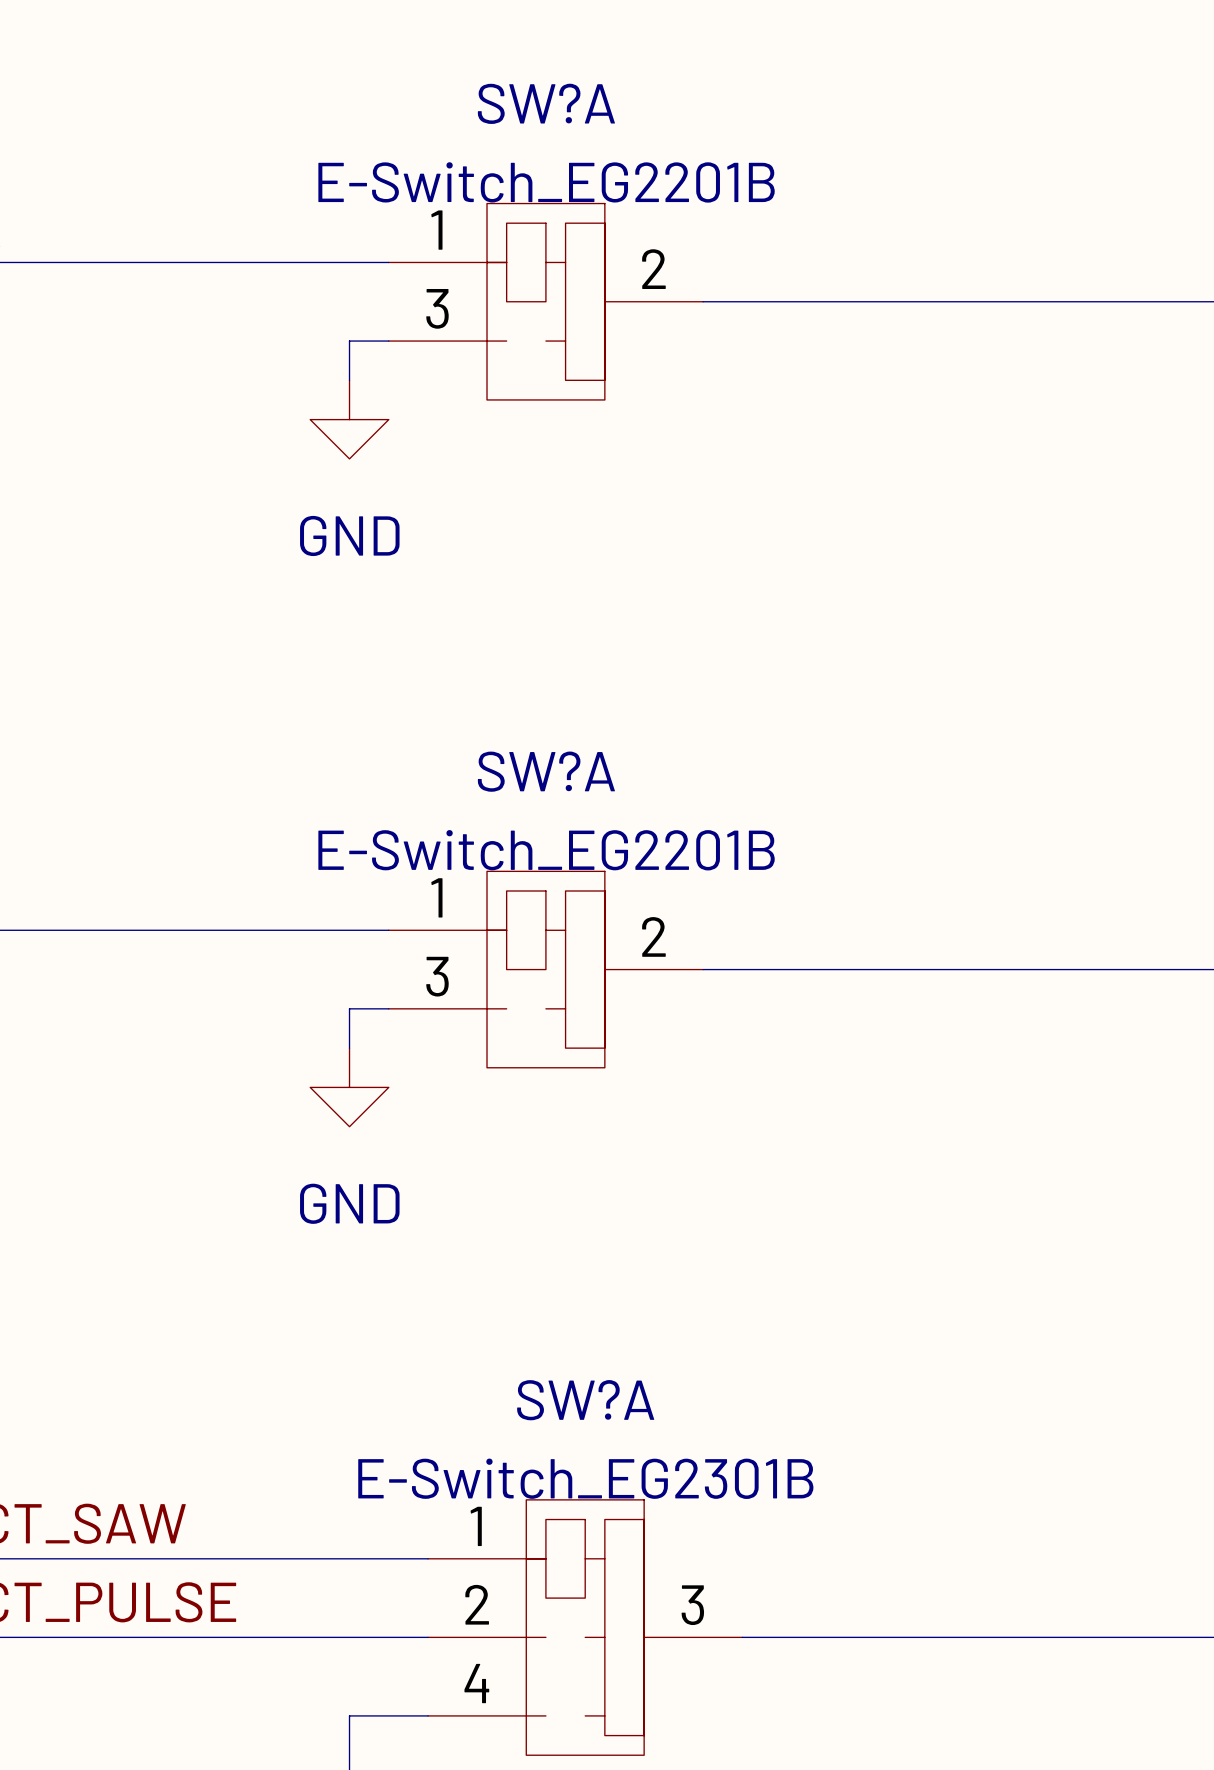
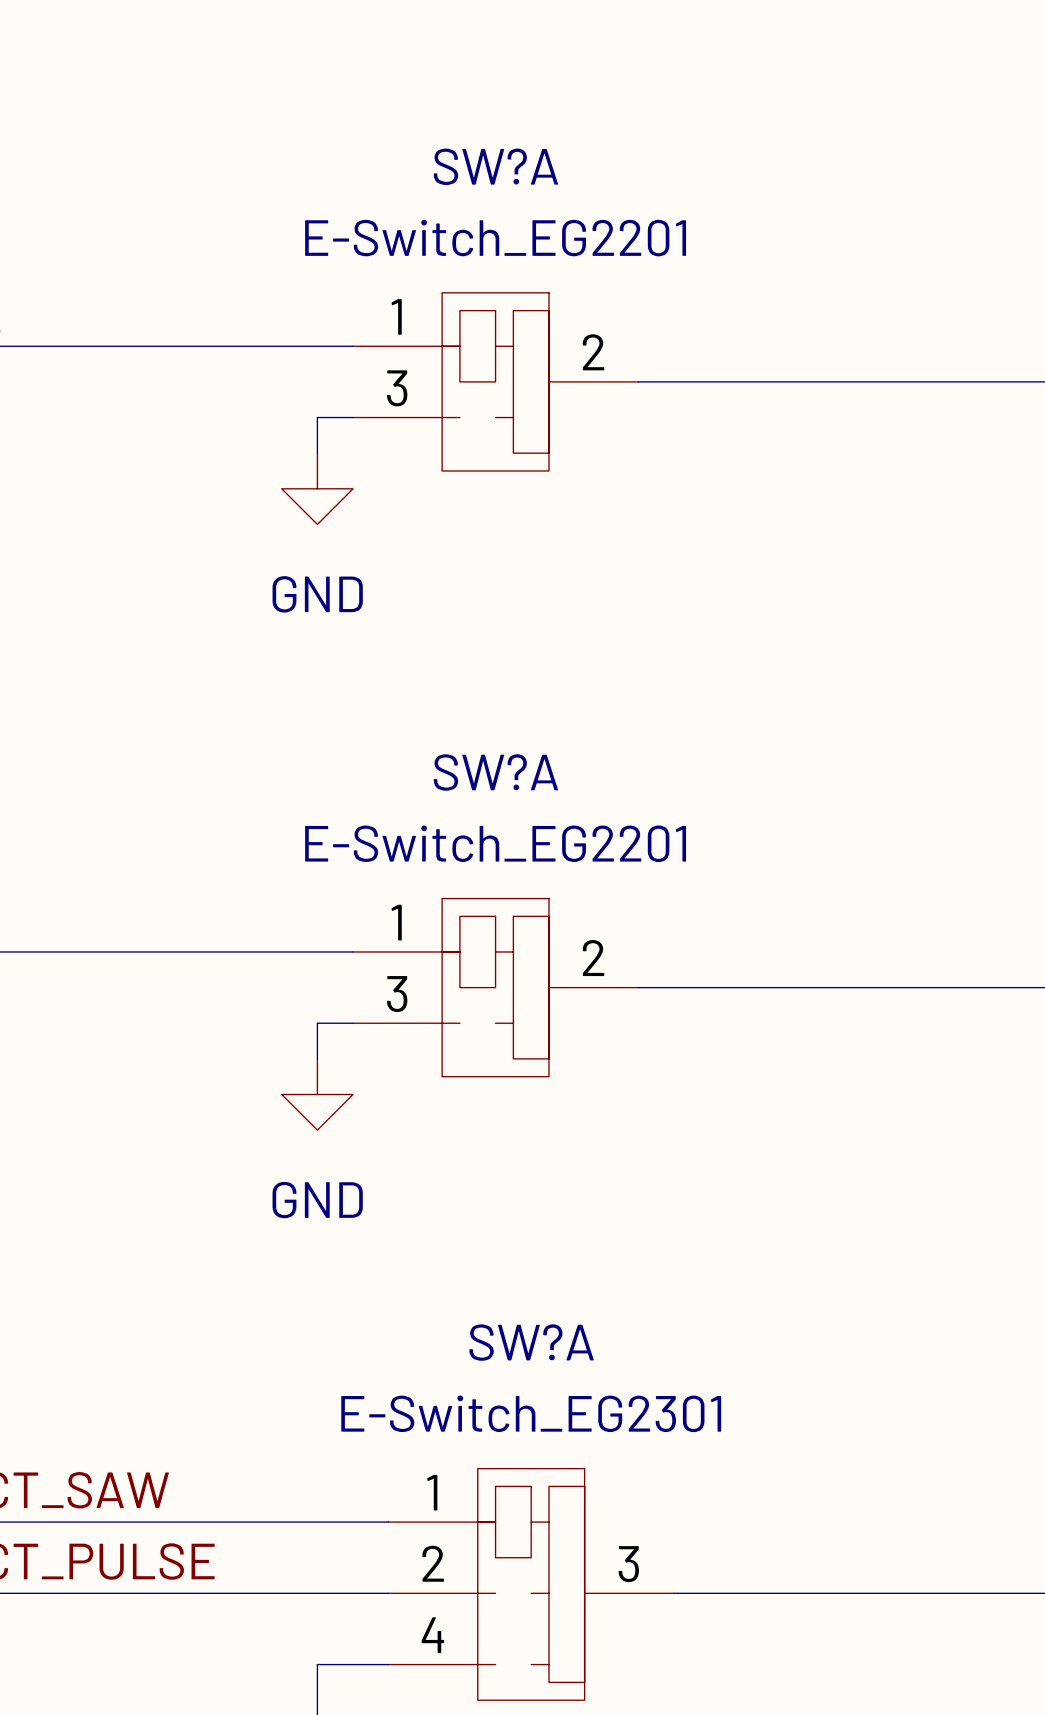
SW?A name position: SW?A (546, 103) -> SW?A (495, 166)
SW?A value: E-Switch_EG2201B (546, 182) -> E-Switch_EG2201 (495, 238)
SW?A name position: SW?A (546, 771) -> SW?A (495, 772)
SW?A value: E-Switch_EG2201B (546, 850) -> E-Switch_EG2201 (495, 843)
SW?A name position: SW?A (585, 1400) -> SW?A (531, 1342)
SW?A value: E-Switch_EG2301B (585, 1478) -> E-Switch_EG2301 (531, 1413)

